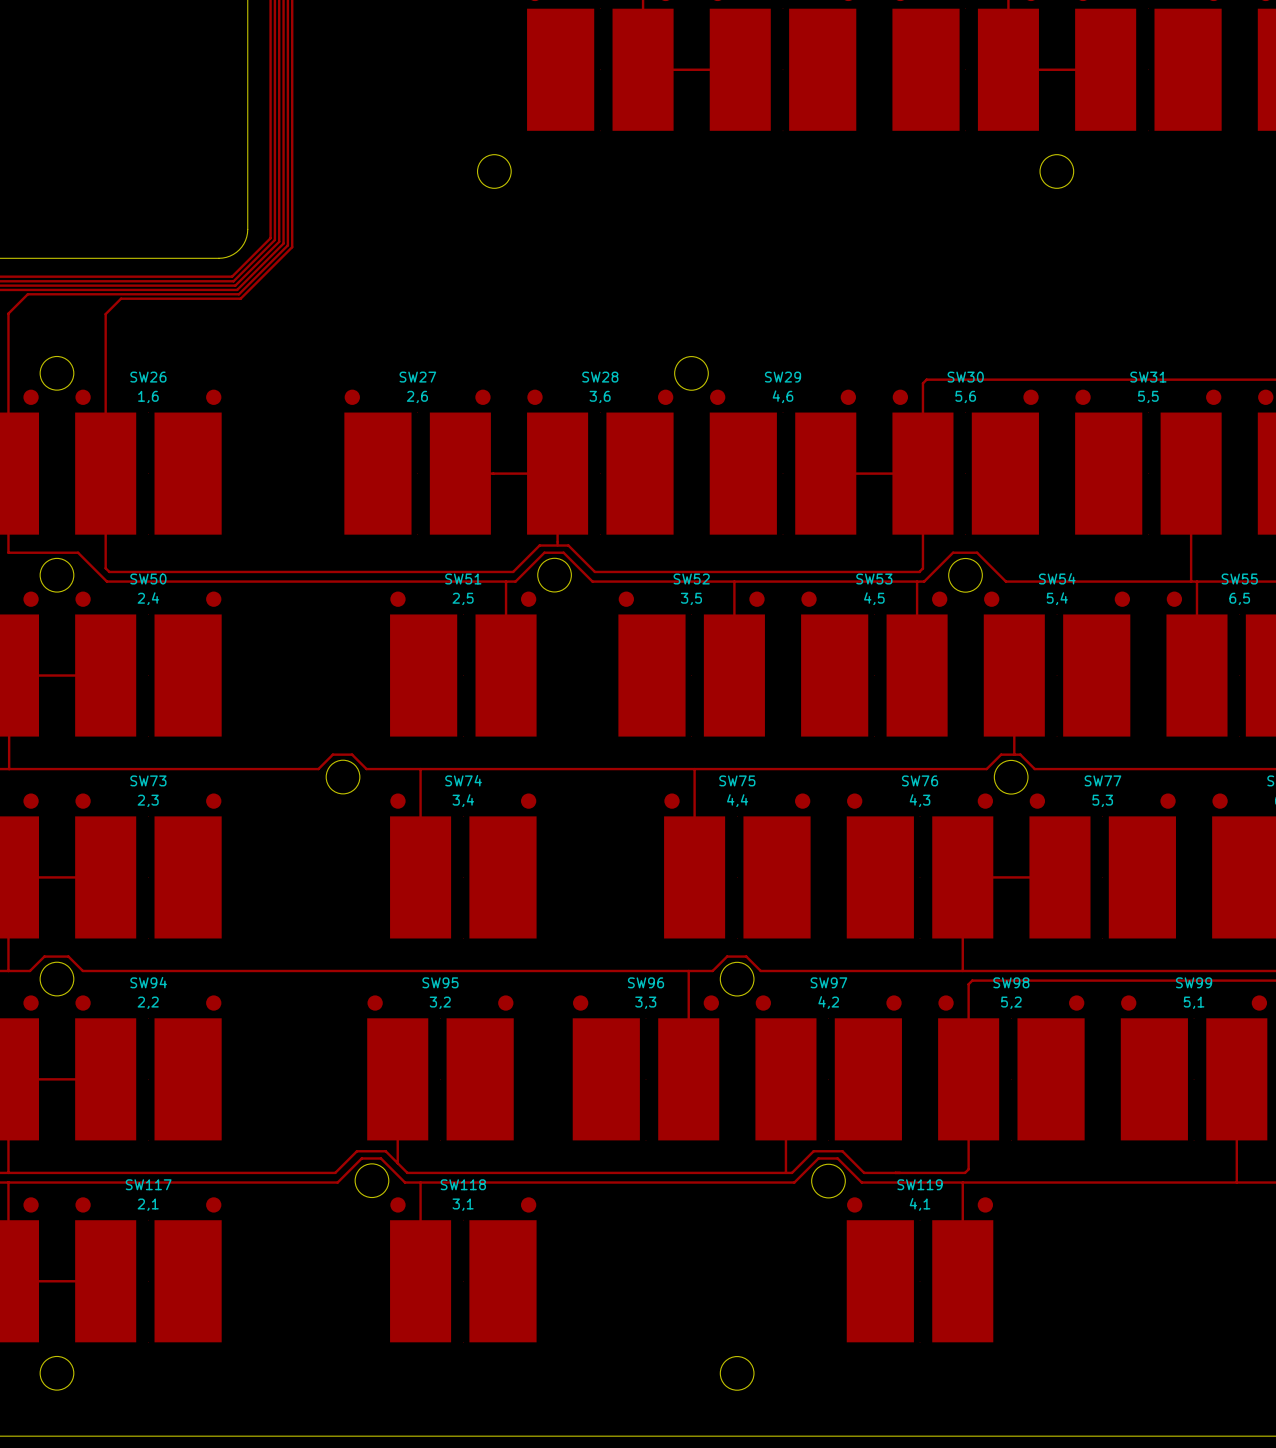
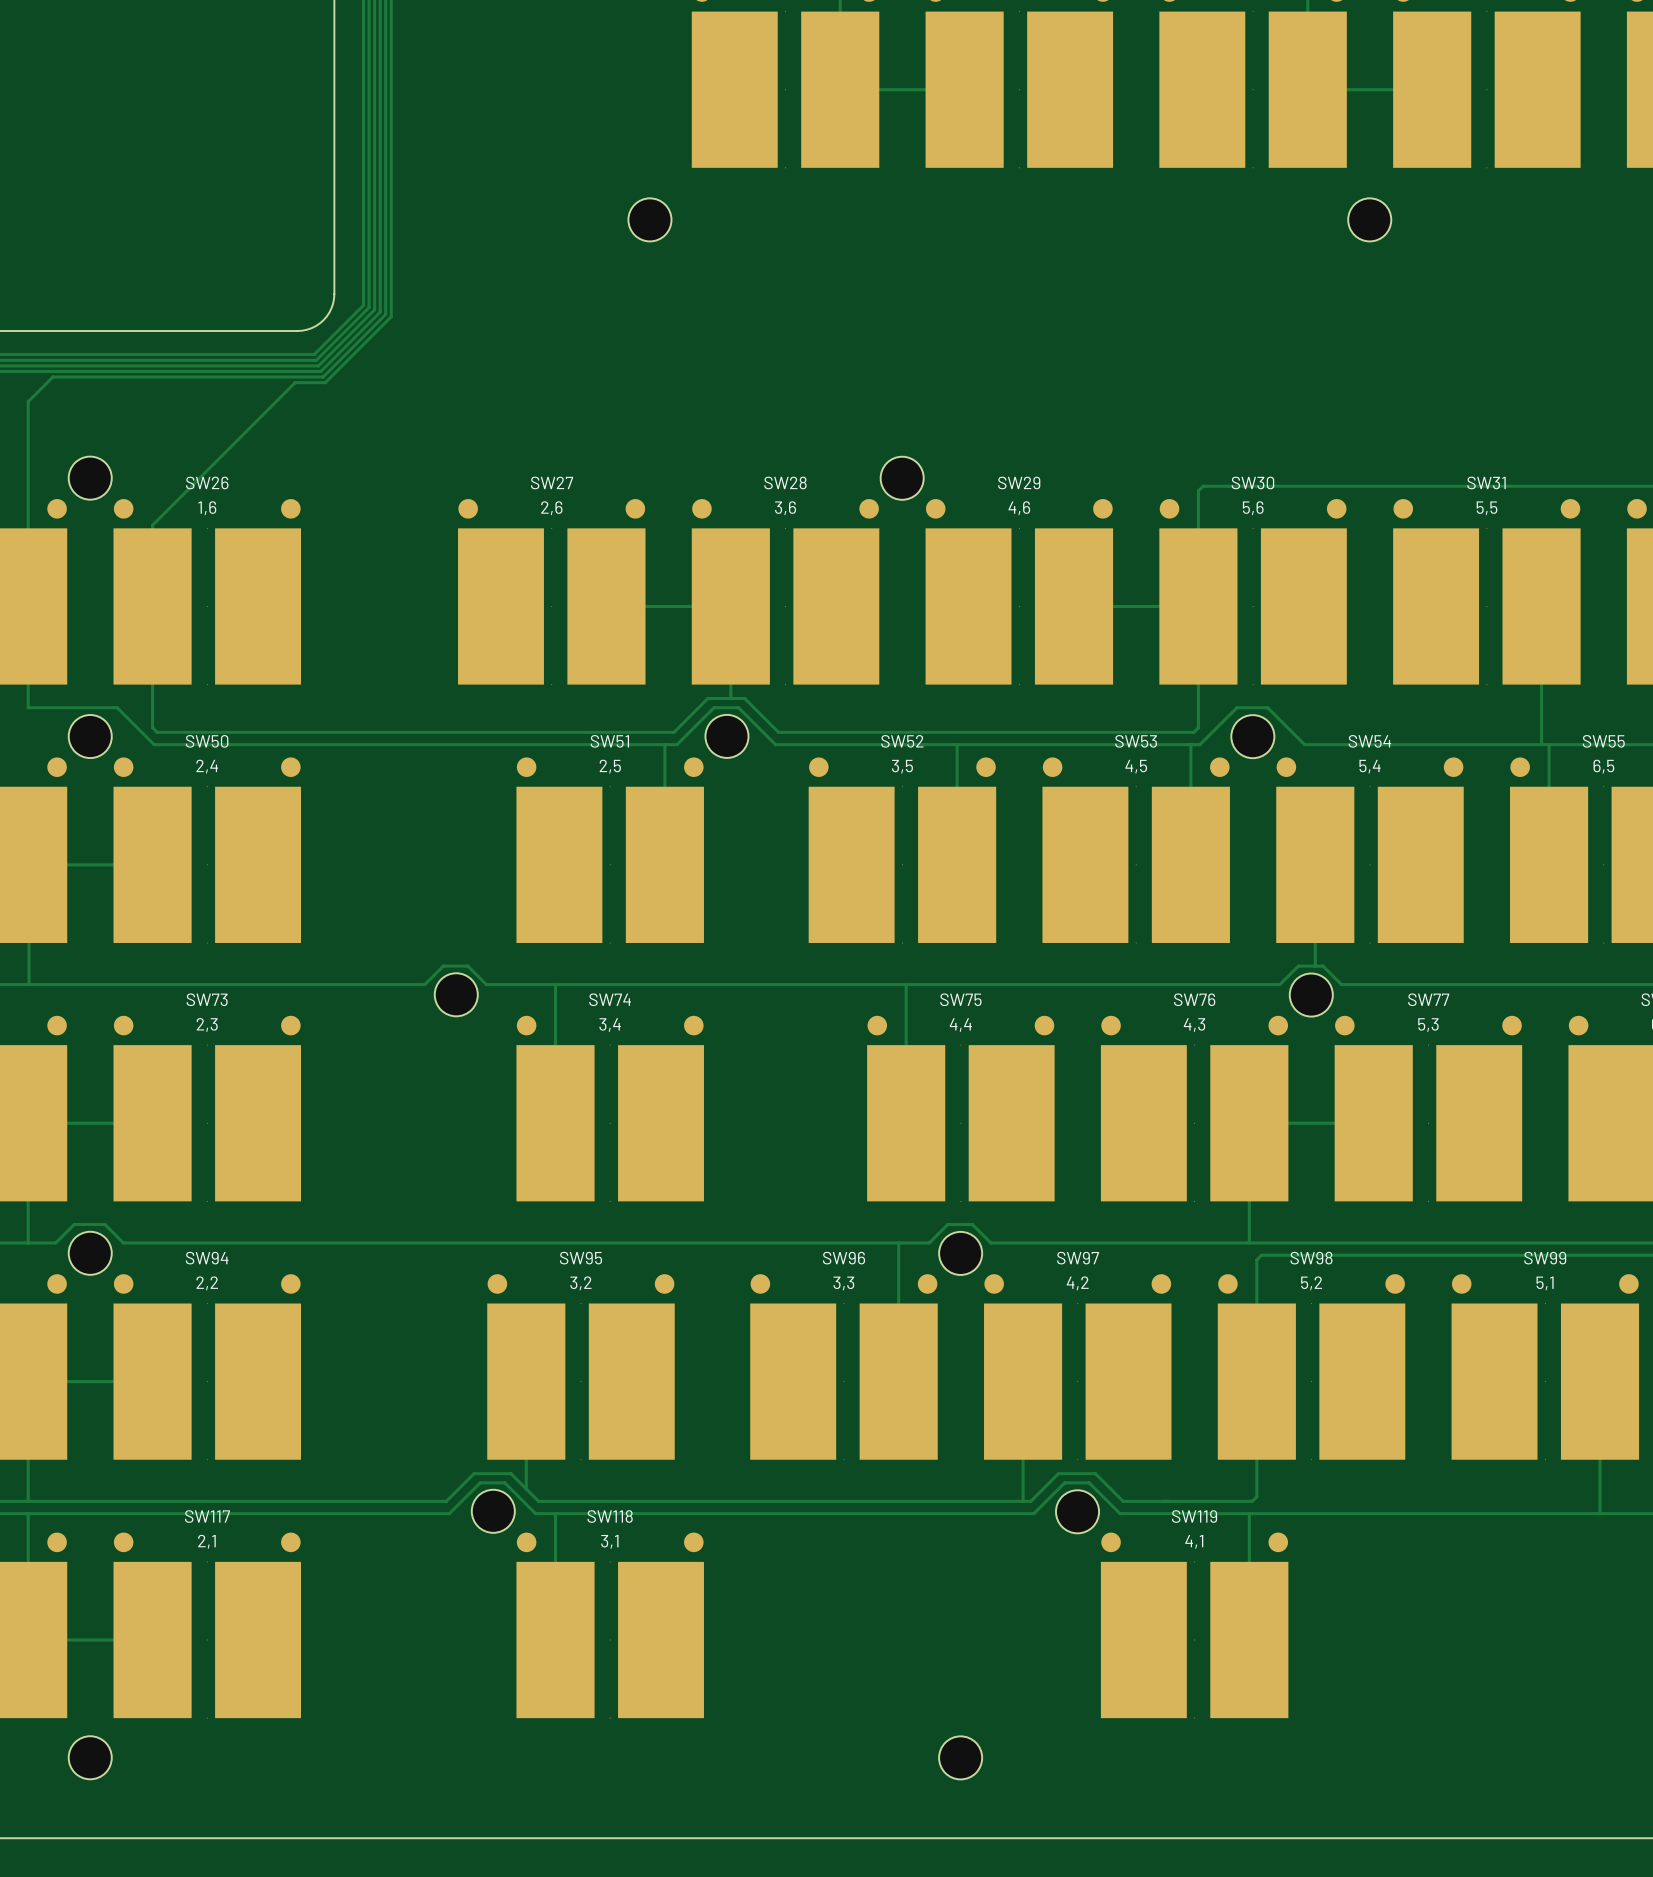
track: (217, 298) (121, 298) (105, 314) (105, 410) -> (295, 382) (152, 525)

